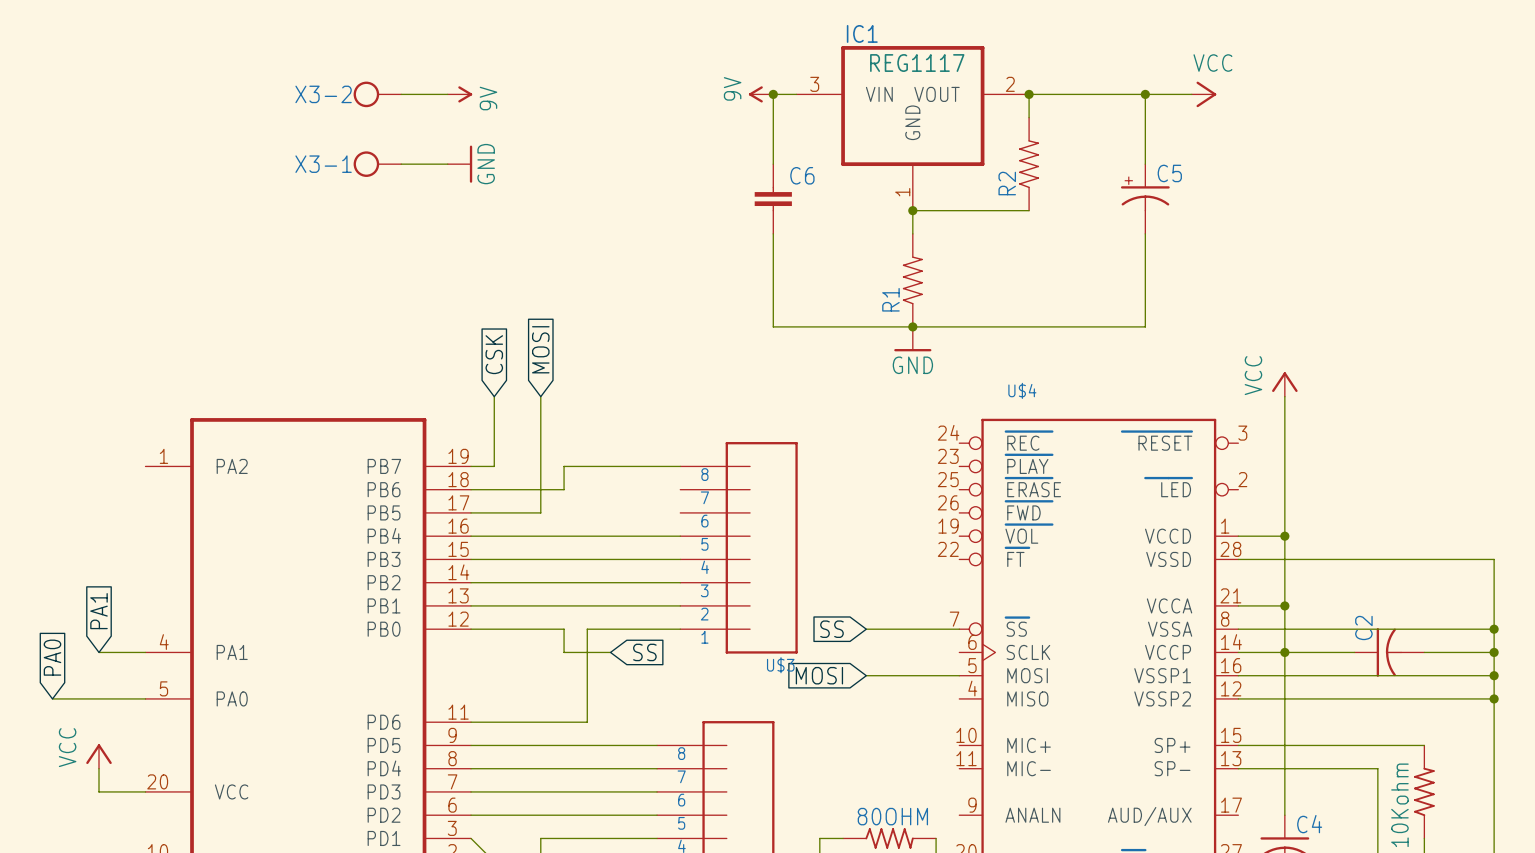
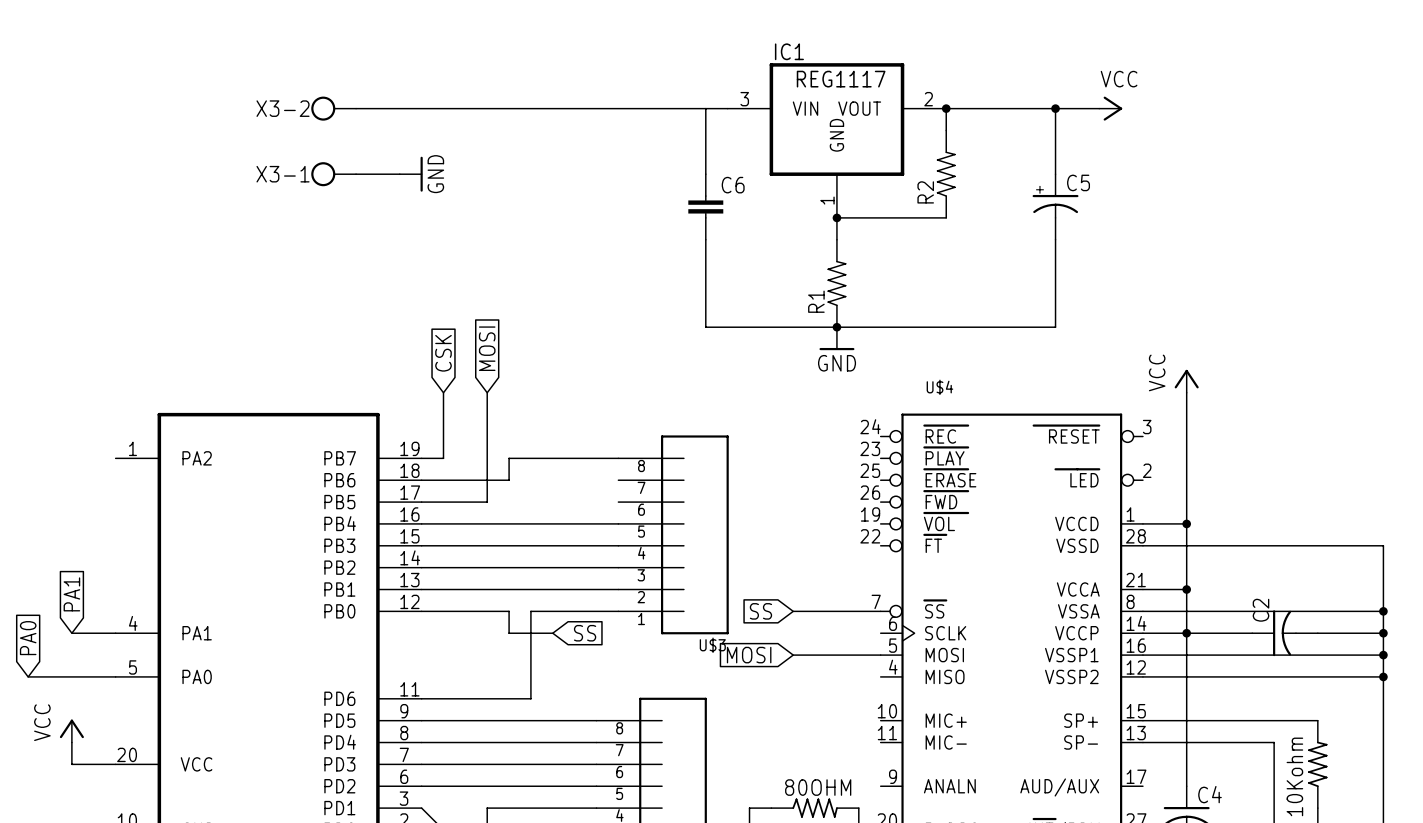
wire: none -> (399, 108) (705, 108)
power symbol: 9V (459, 94) -> none
power symbol: 9V (761, 94) -> none
junction: (773, 94) -> none

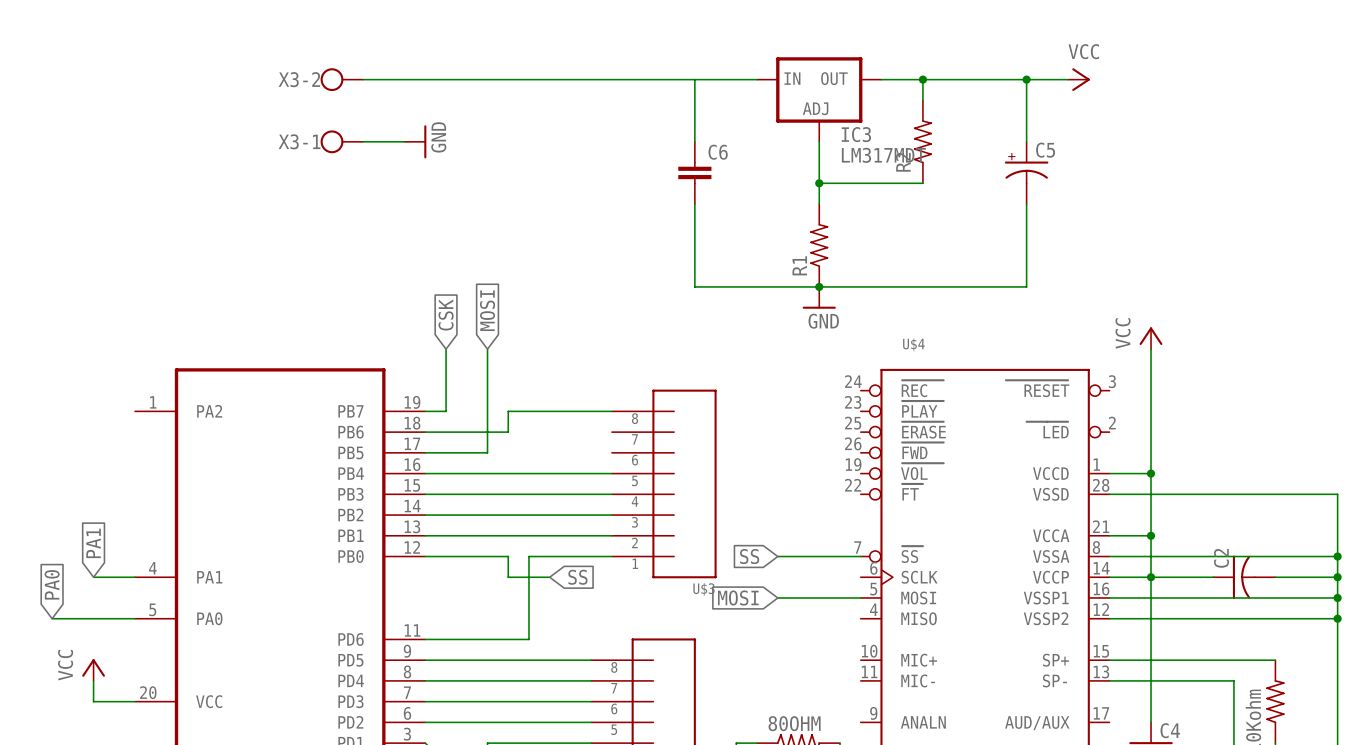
IC3: none -> LM317MDT (819, 99)
IC1: REG1117 (836, 140) -> none

